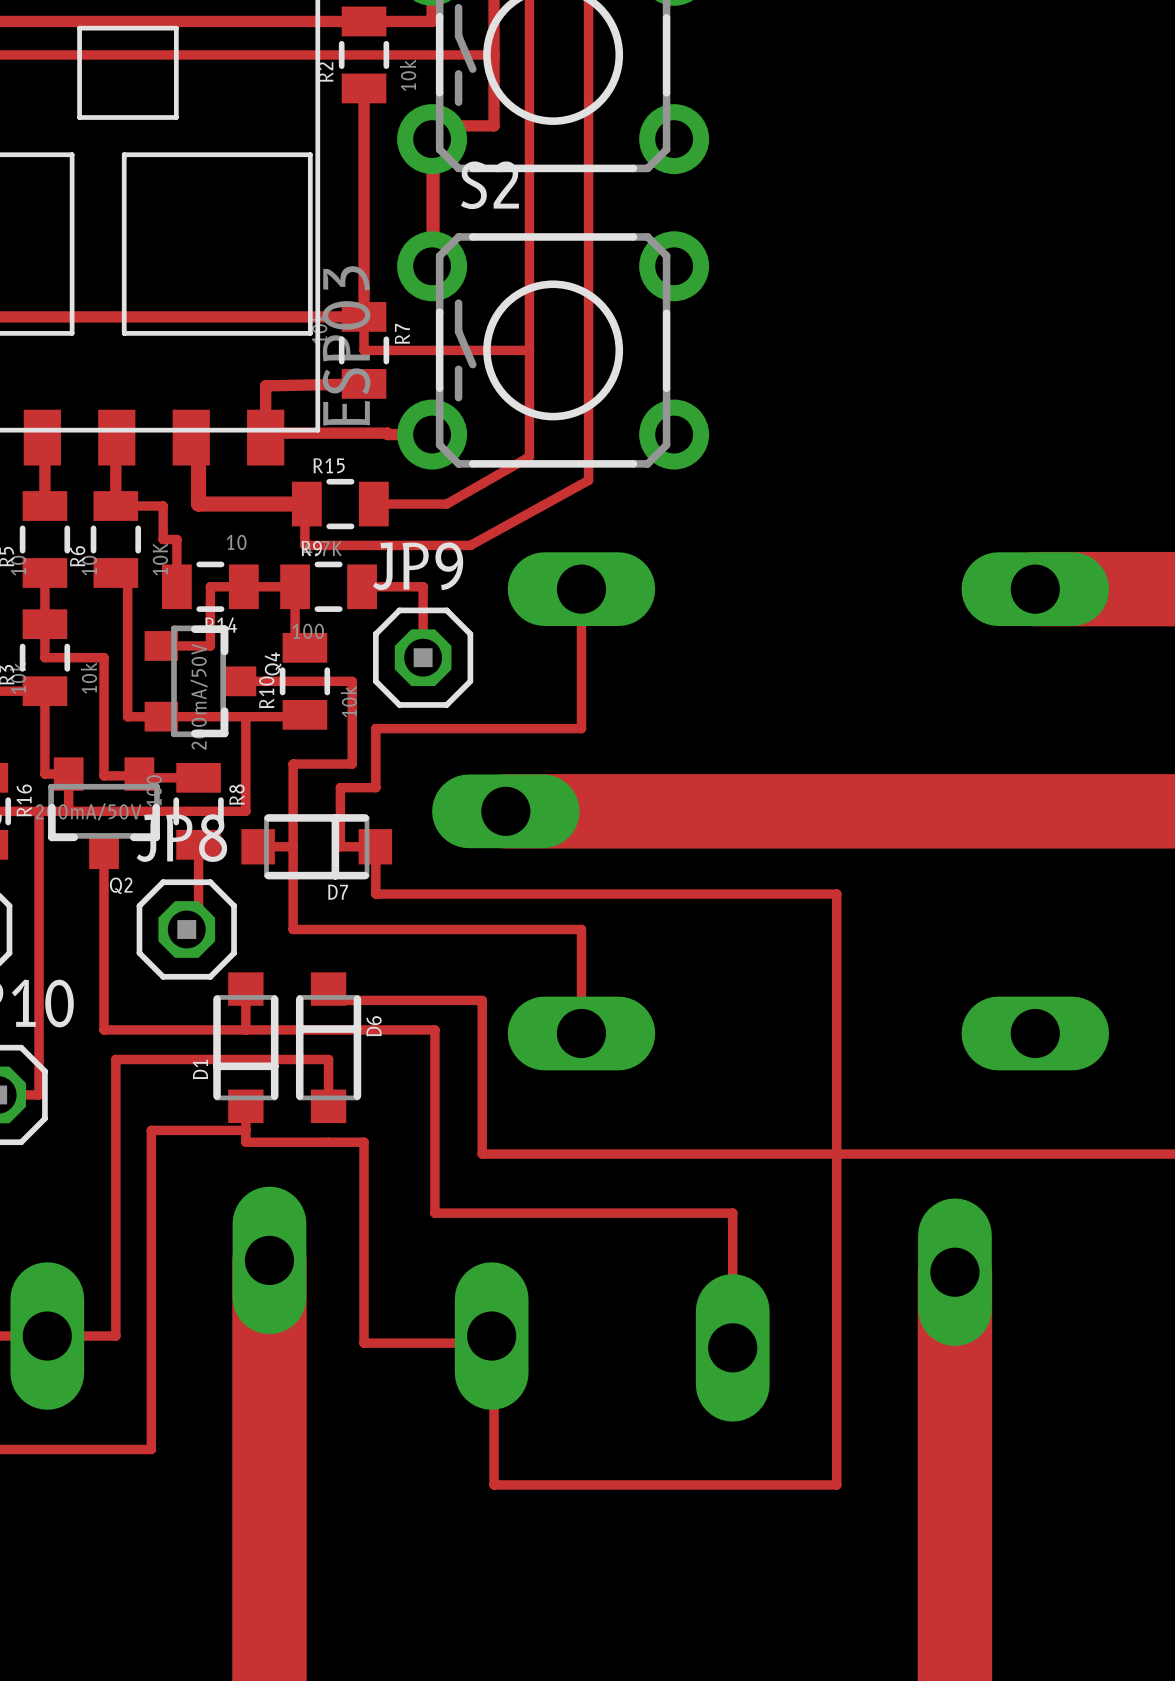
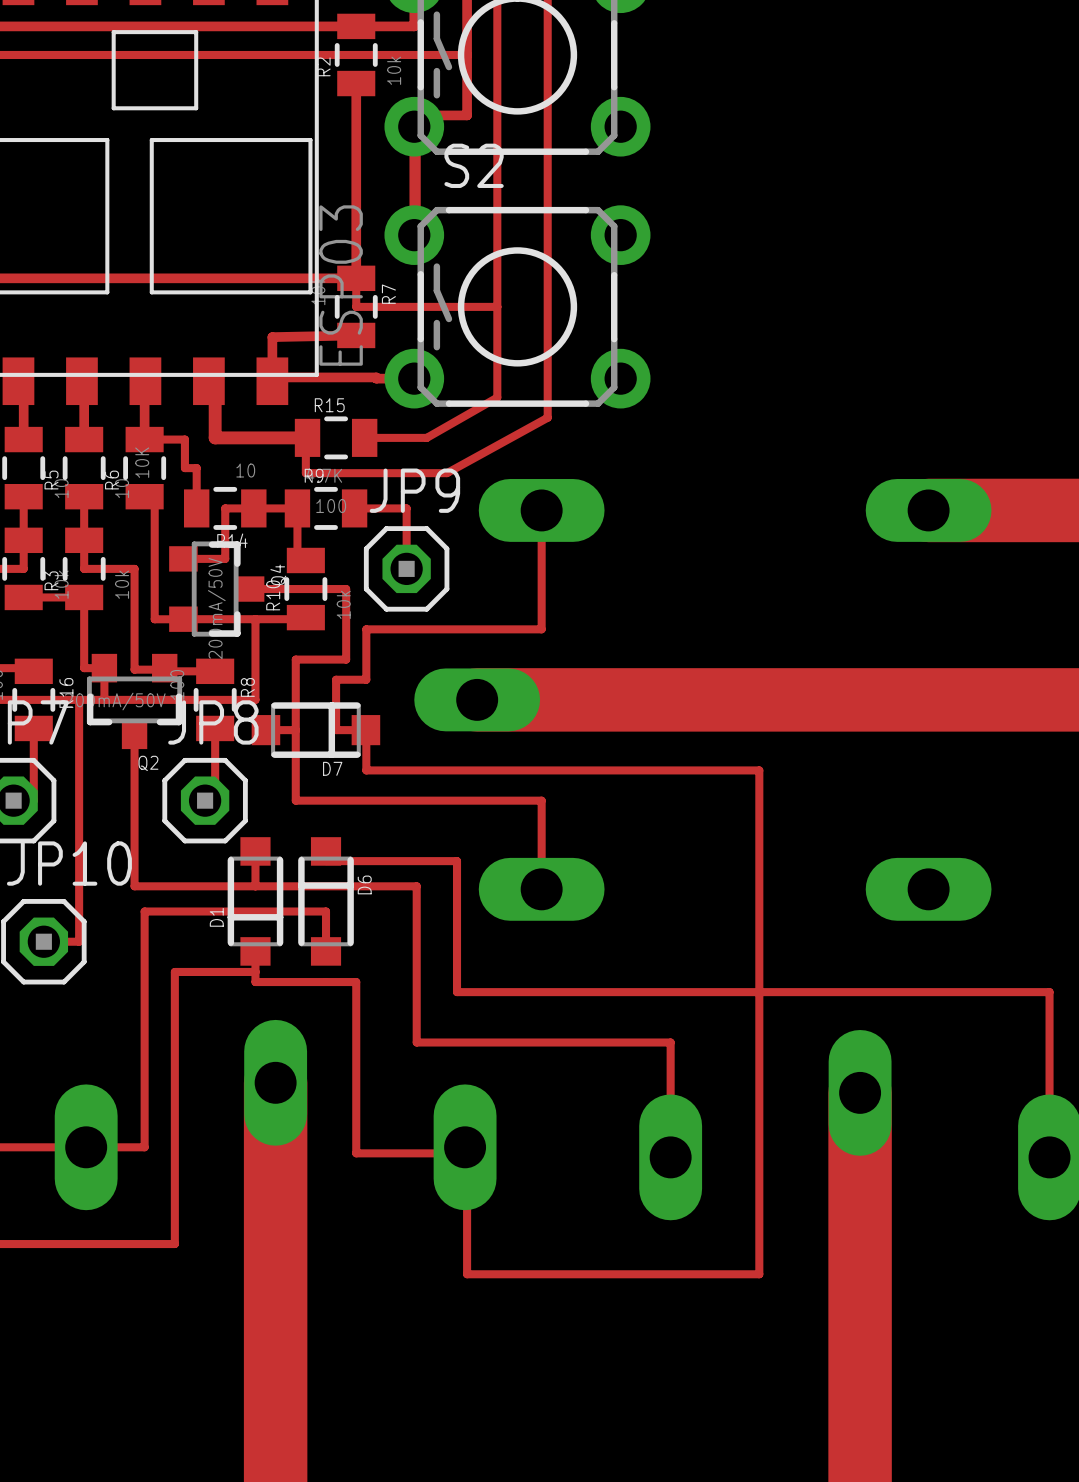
R6 value position: 10K (160, 559) -> 10K (142, 462)
R9 value position: 100 (308, 631) -> 100 (331, 506)

